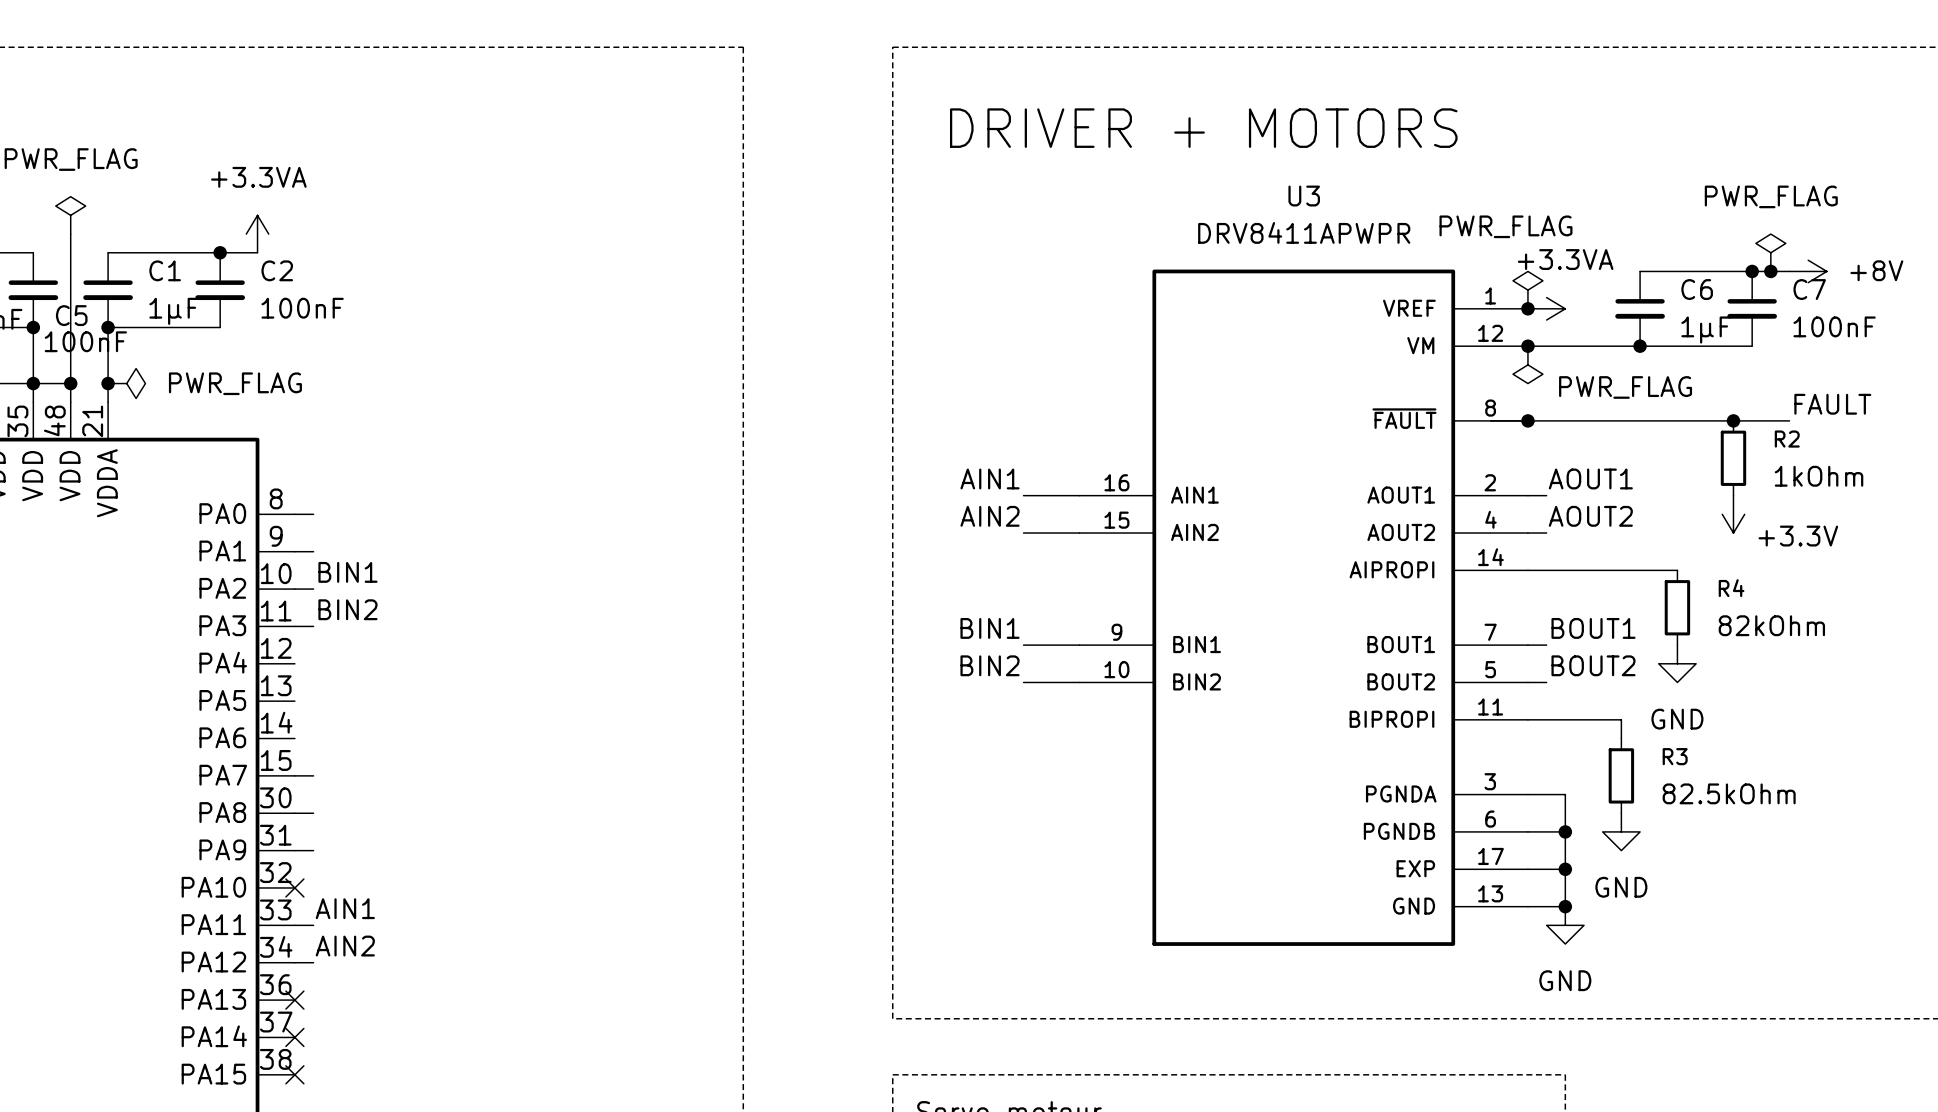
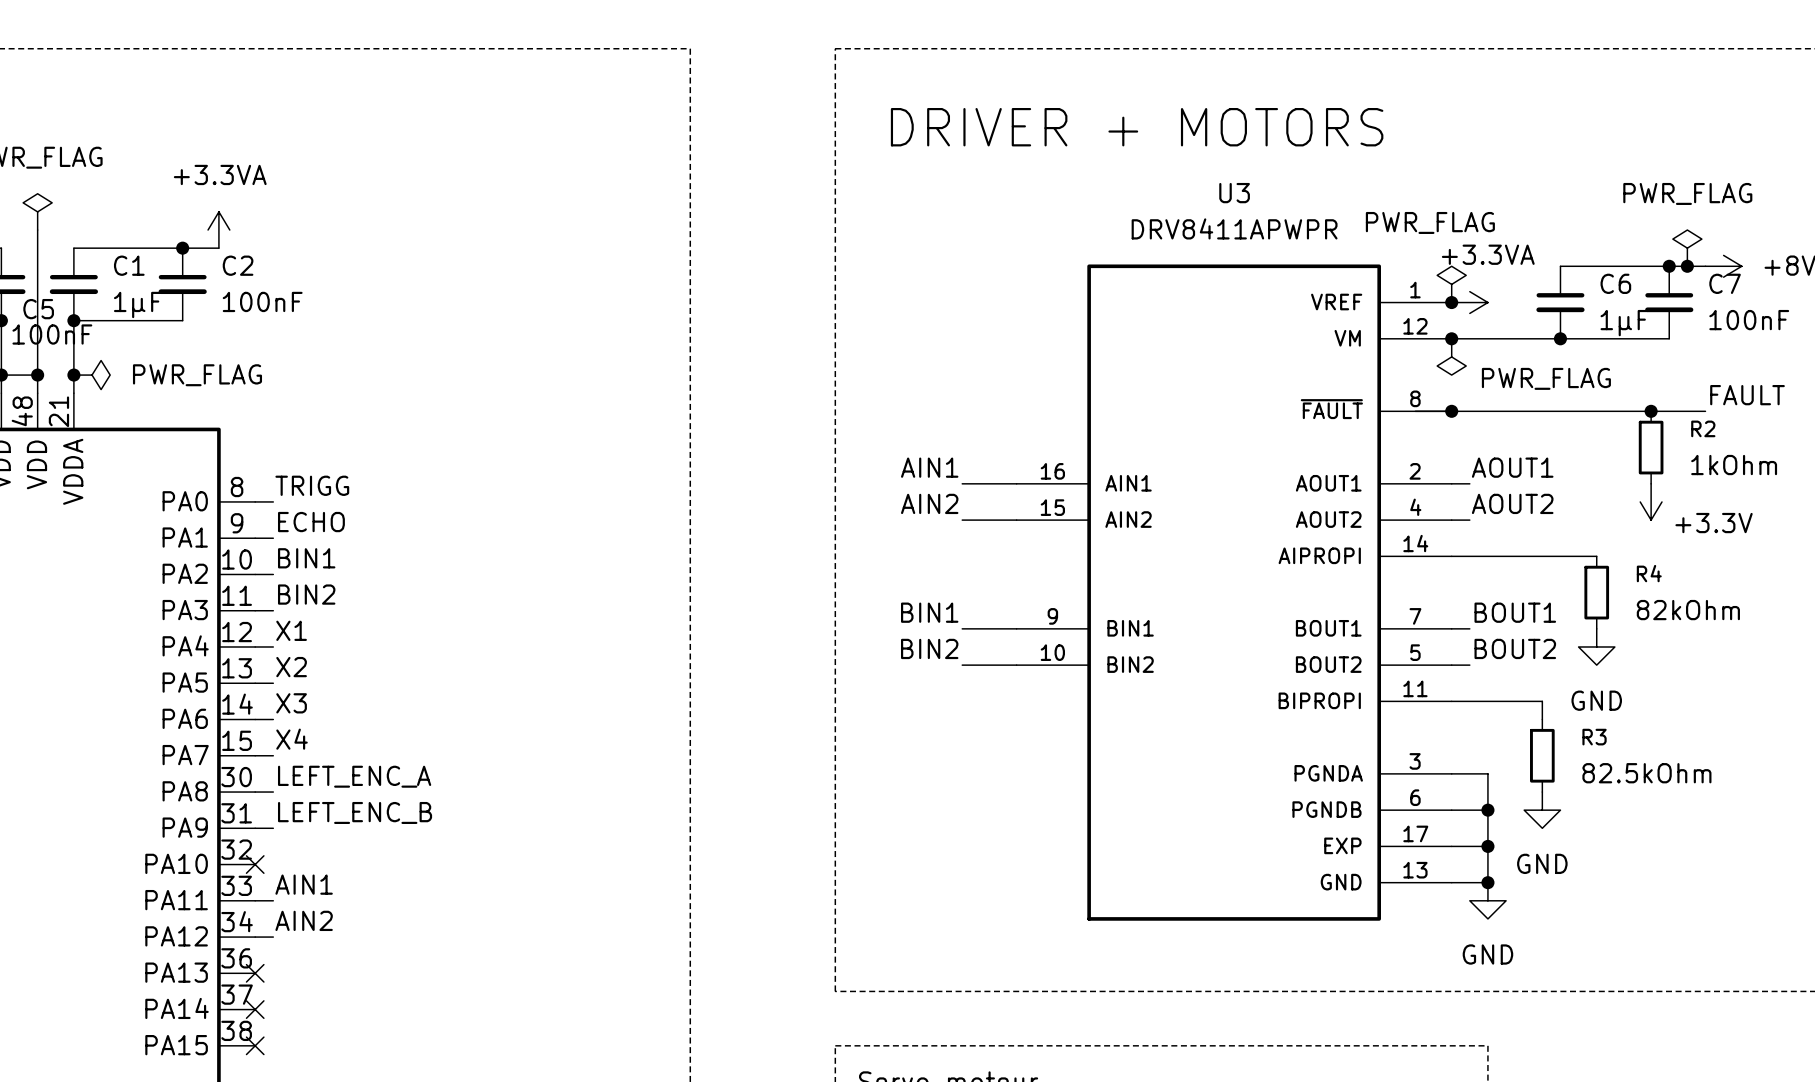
label: none -> TRIGG (312, 485)
label: none -> ECHO (311, 522)
label: none -> X1 (291, 630)
wire: none -> (255, 646) (273, 646)
label: none -> X2 (291, 667)
wire: none -> (255, 683) (273, 683)
label: none -> X3 (291, 703)
wire: none -> (255, 719) (273, 719)
label: none -> X4 (292, 739)
label: none -> LEFT_ENC_A (354, 776)
label: none -> LEFT_ENC_B (355, 812)

